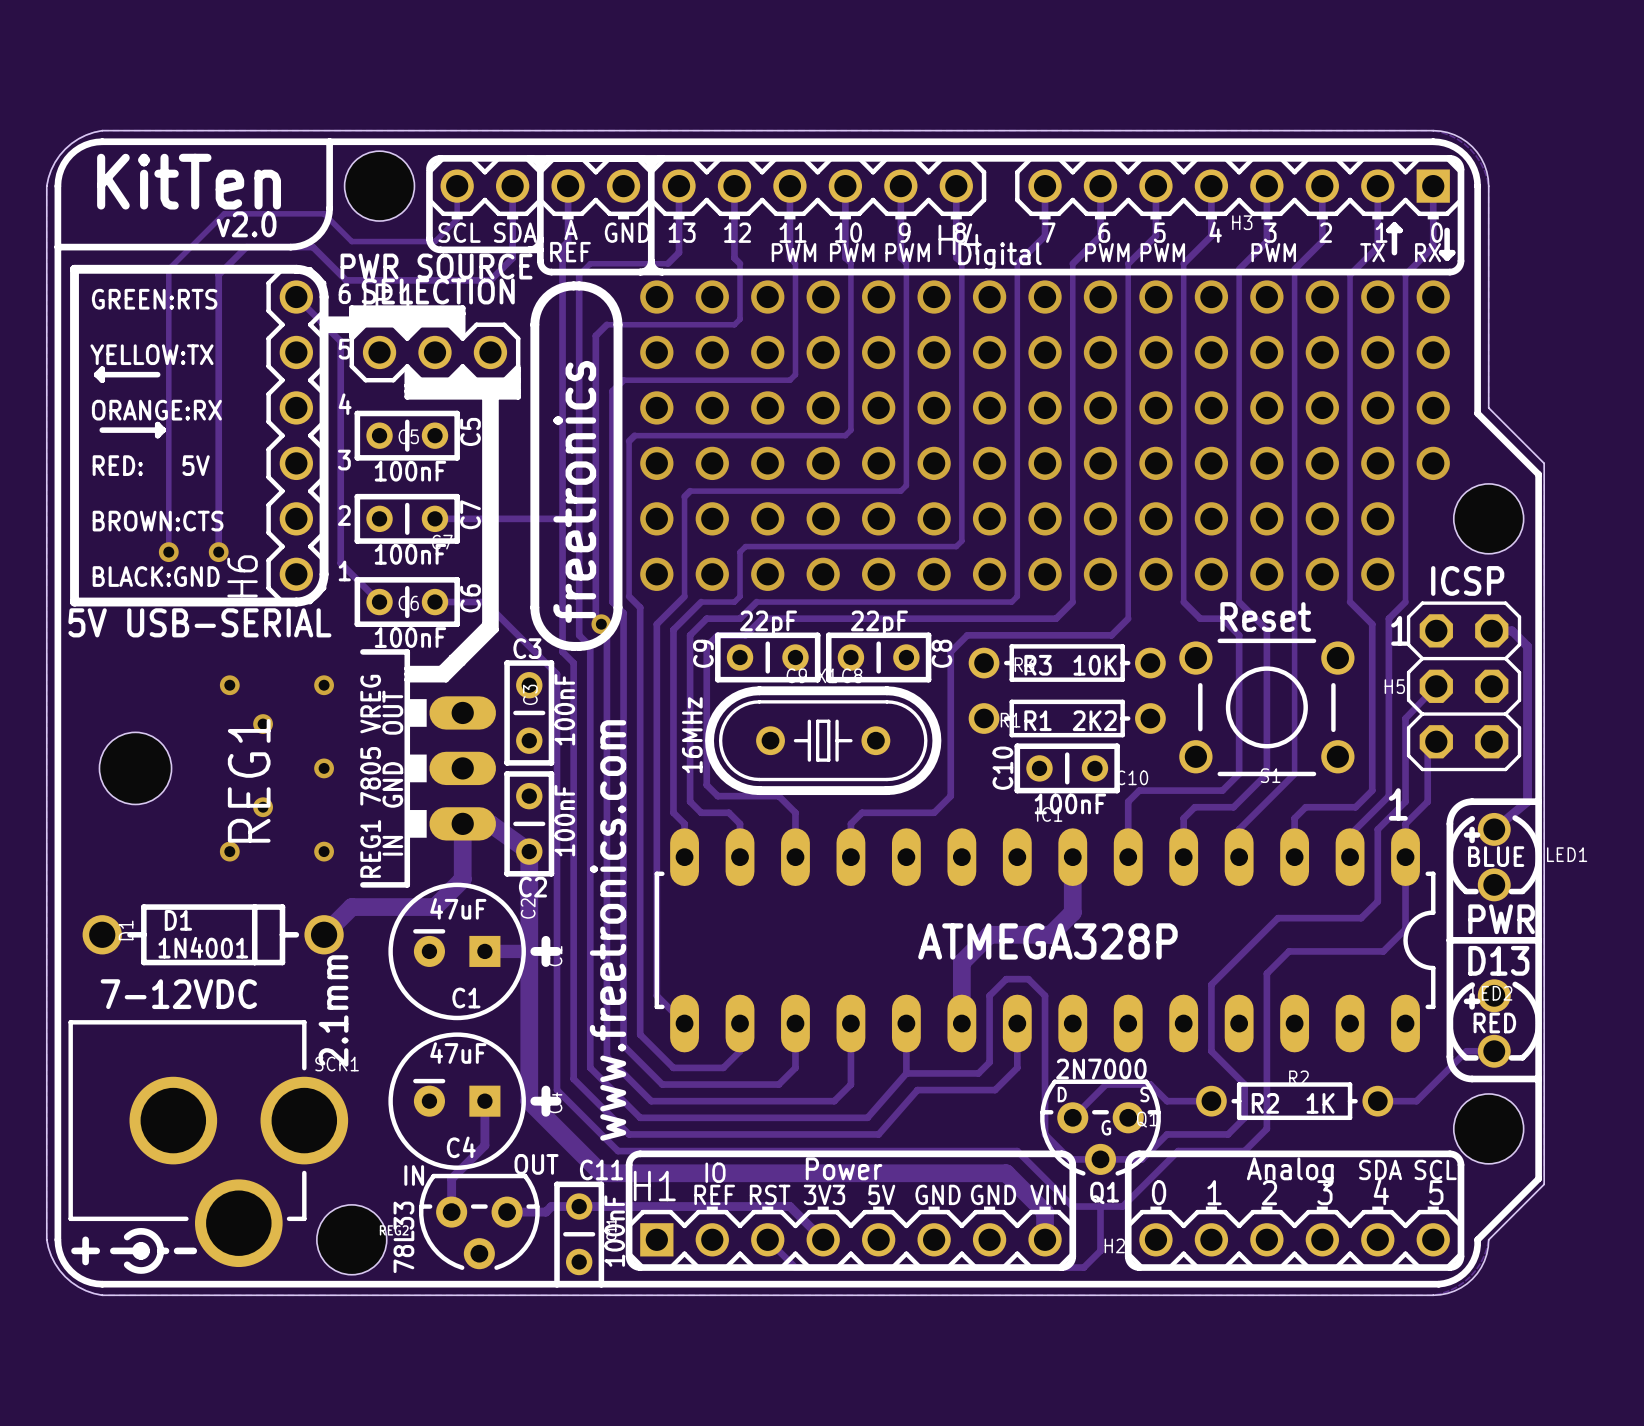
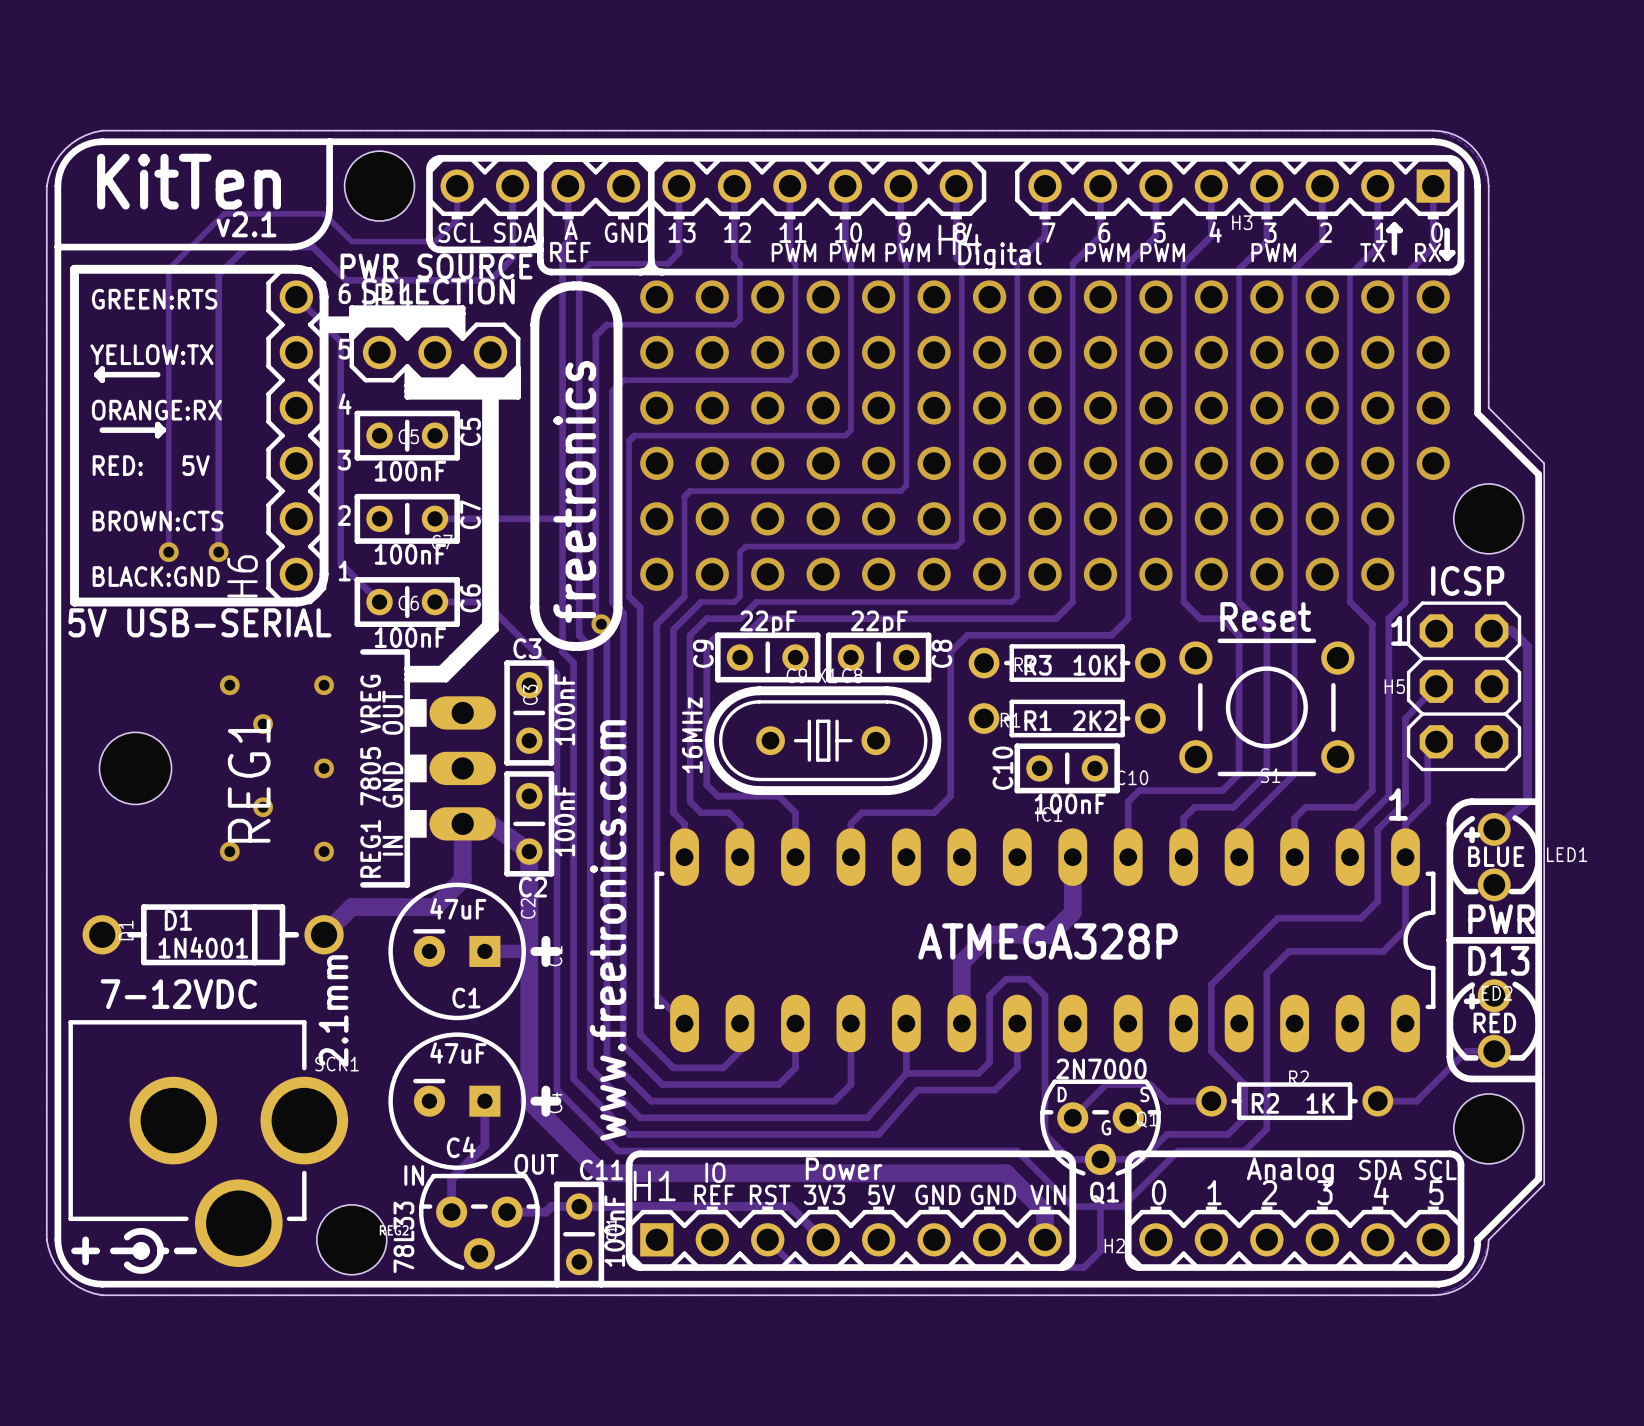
text: v2.0 (246, 224) -> v2.1 (246, 224)

